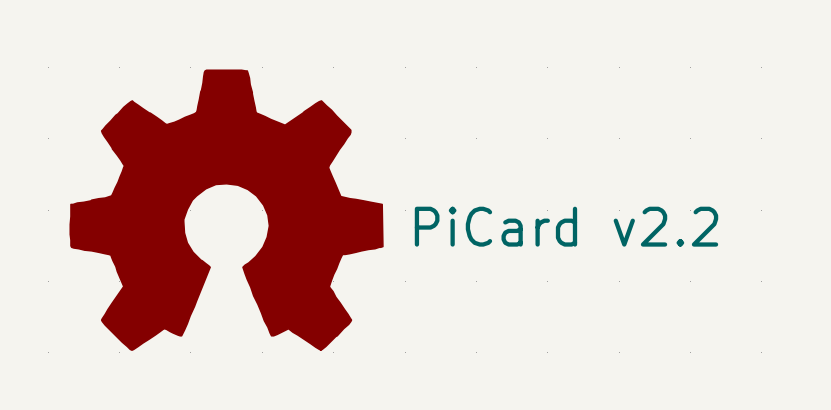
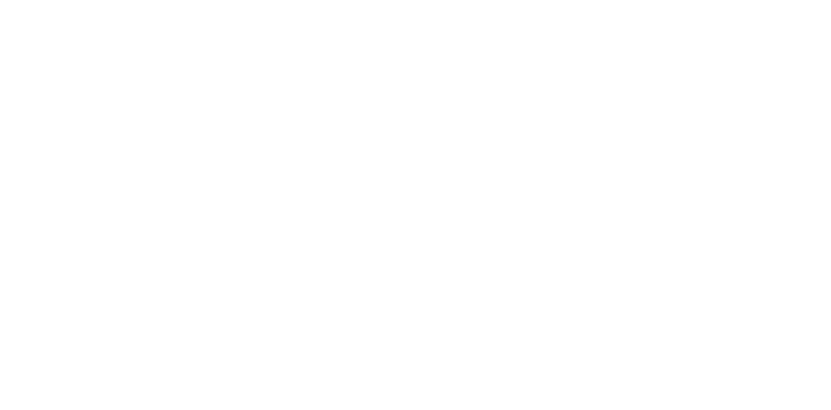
part: PiCard v2.2 (226, 210) -> none

